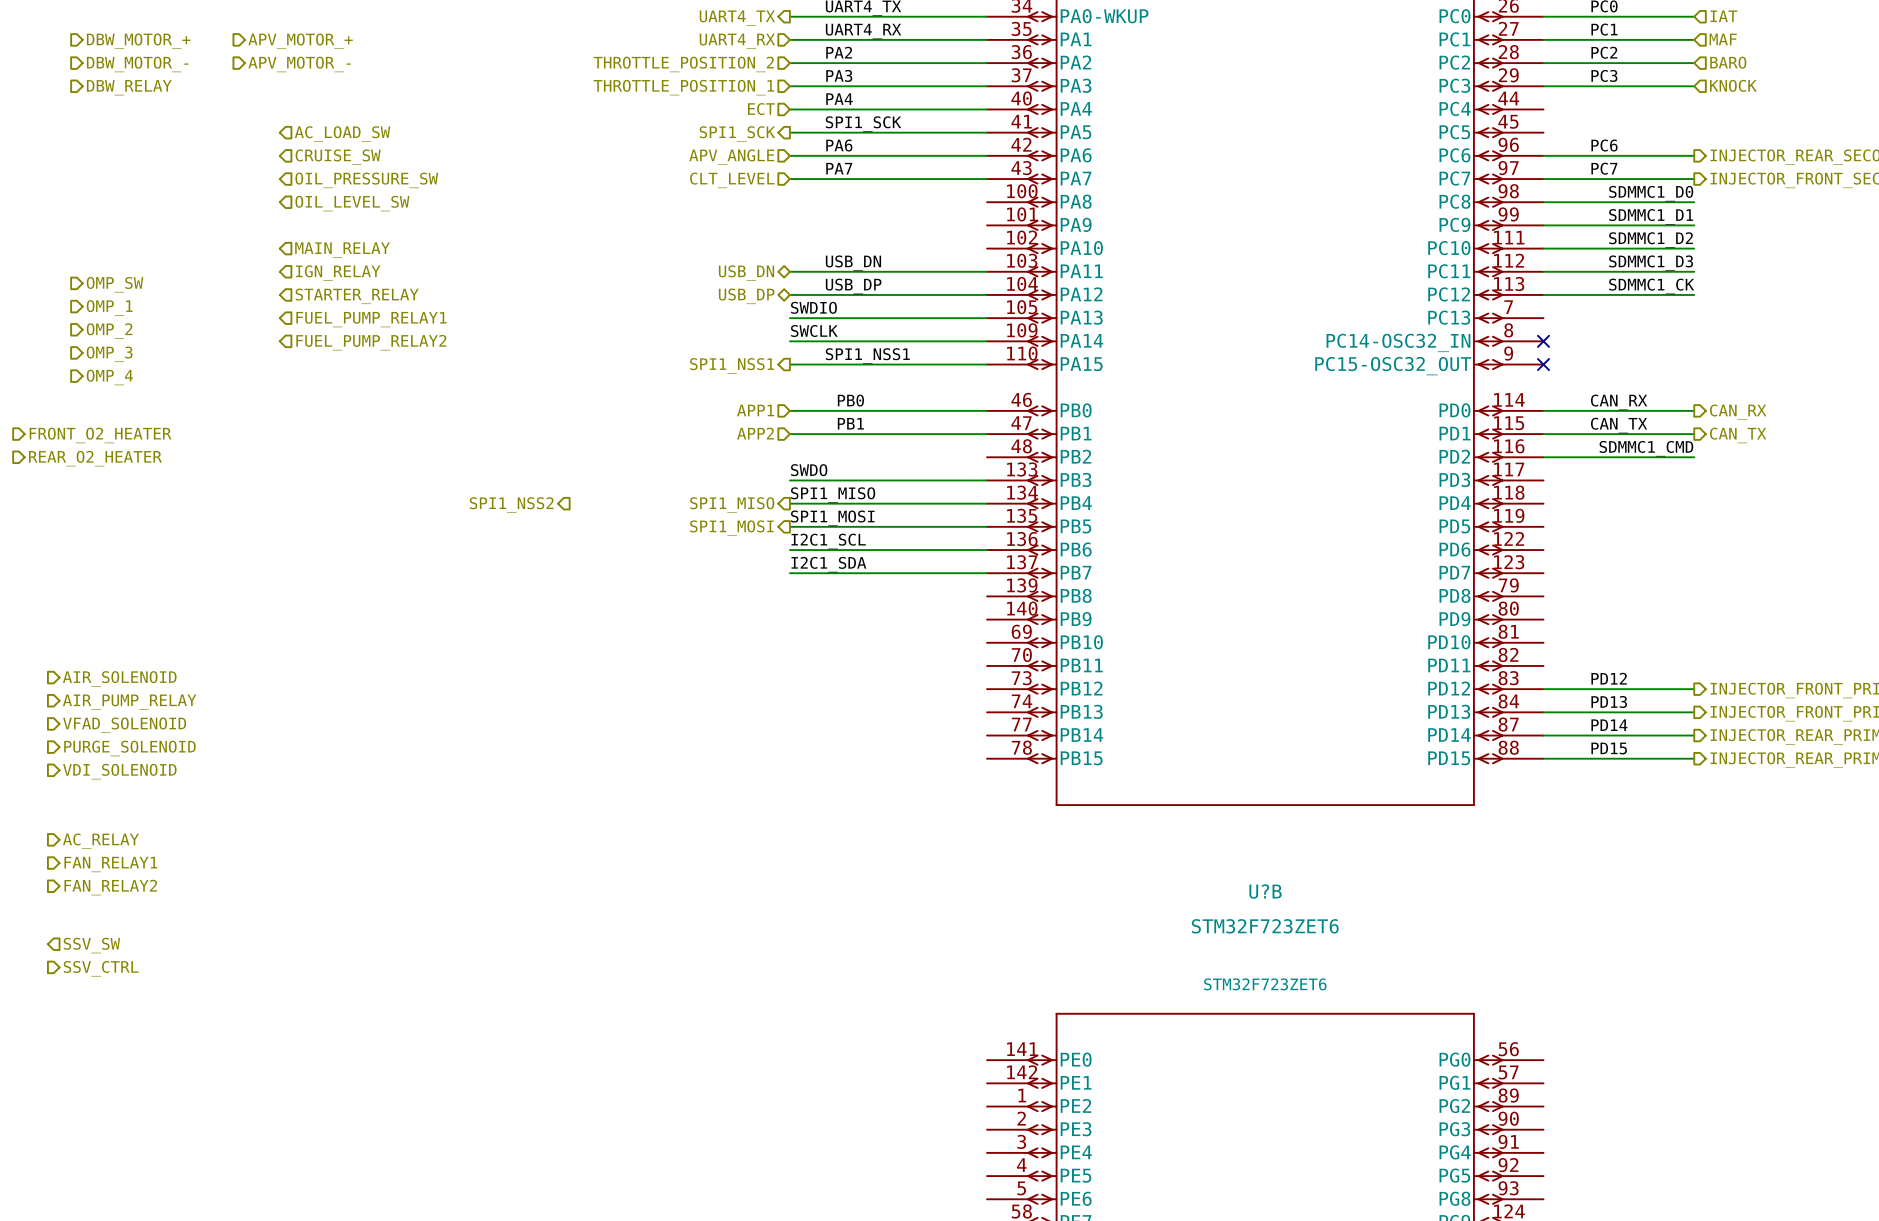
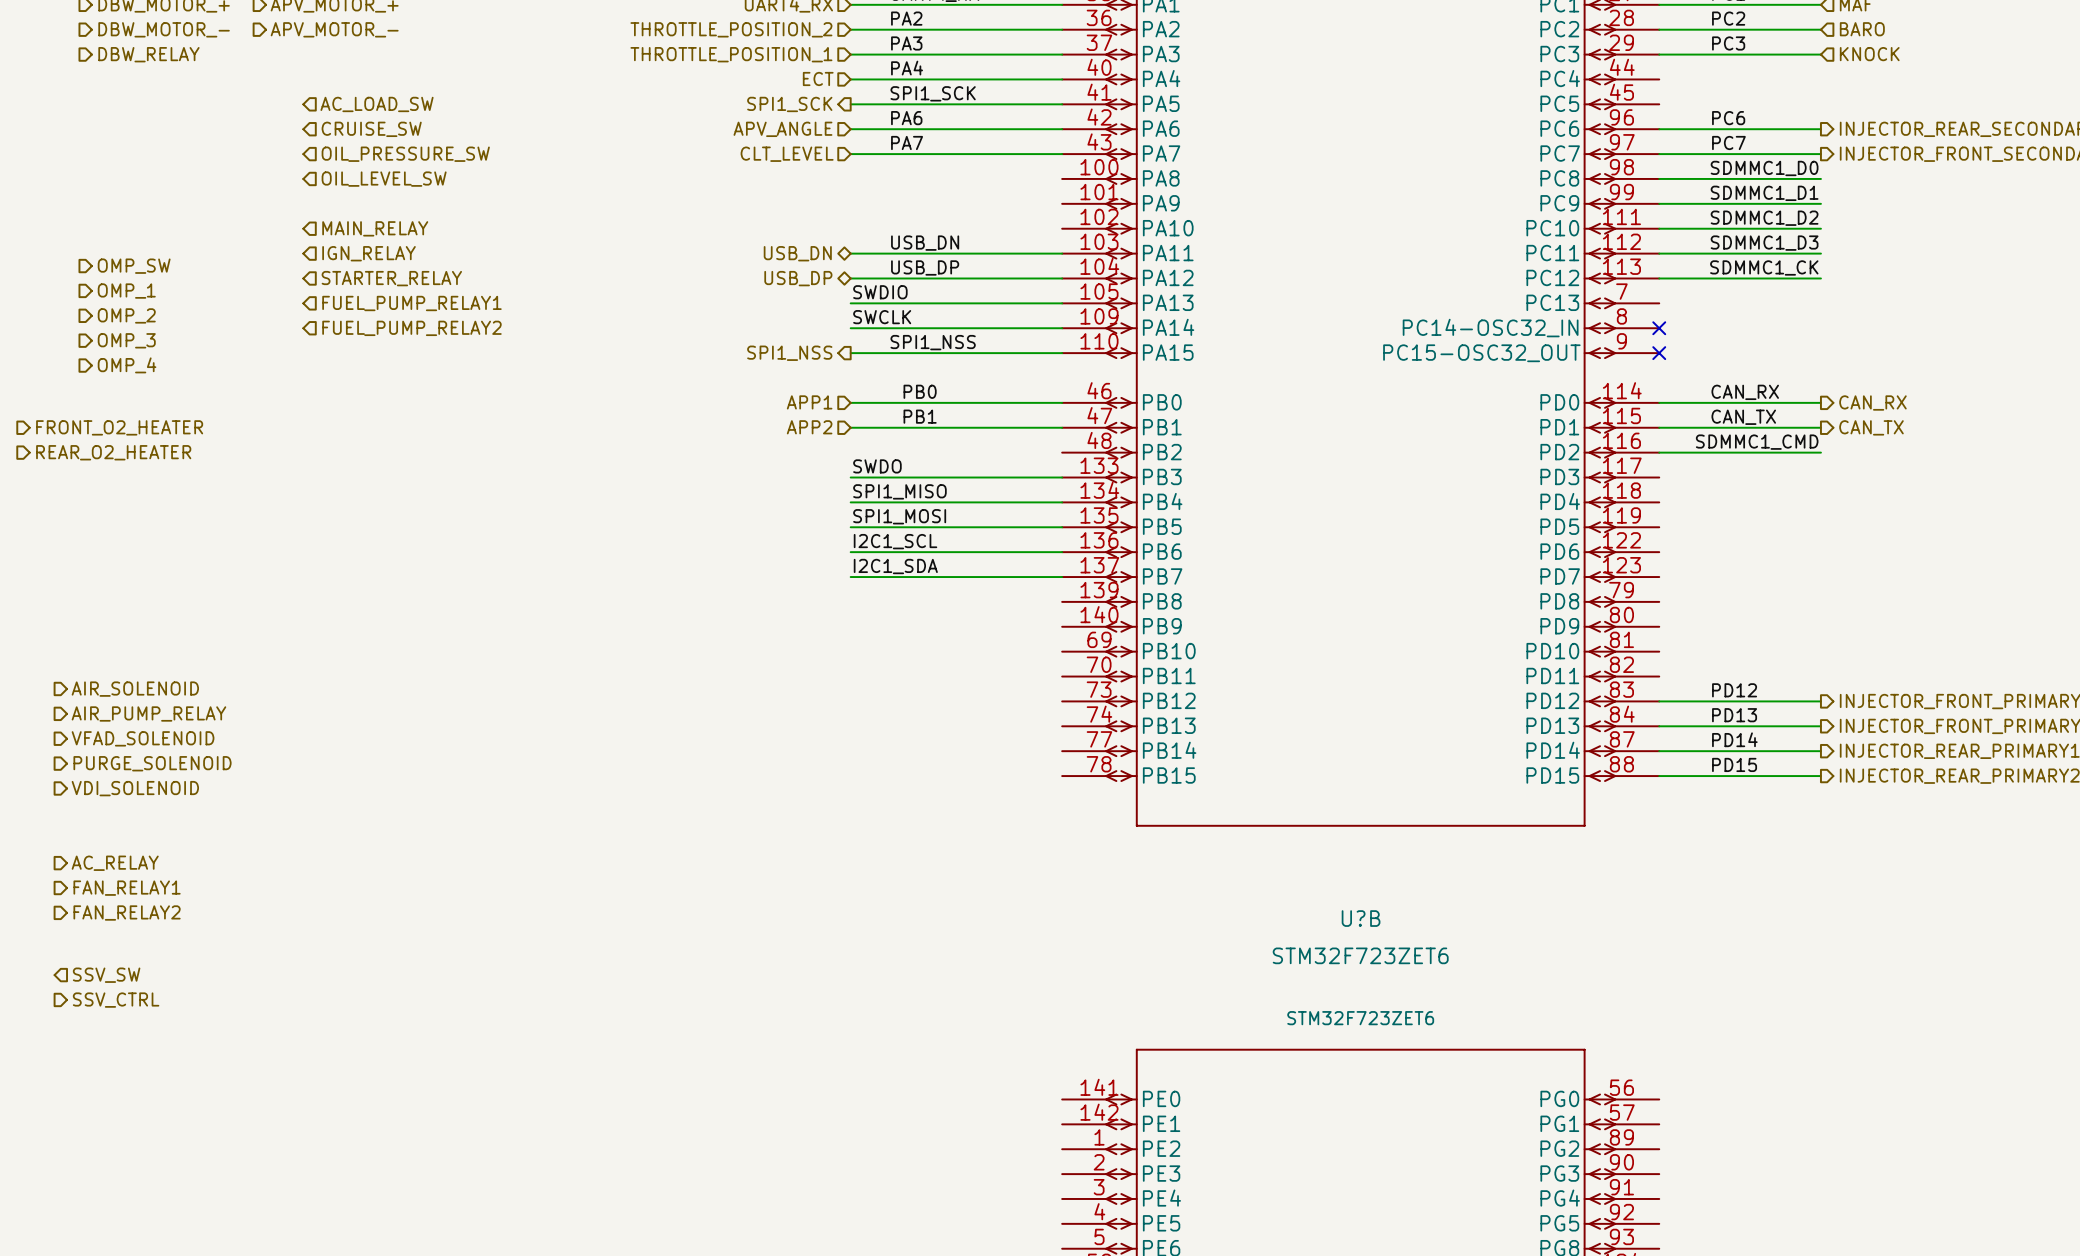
label: SPI1_NSS1 (867, 355) -> SPI1_NSS (933, 342)
hierarchical label: SPI1_NSS1 (732, 365) -> SPI1_NSS (789, 353)
hierarchical label: SPI1_NSS2 (511, 504) -> none
hierarchical label: SPI1_MISO (732, 504) -> none
hierarchical label: SPI1_MOSI (731, 528) -> none

